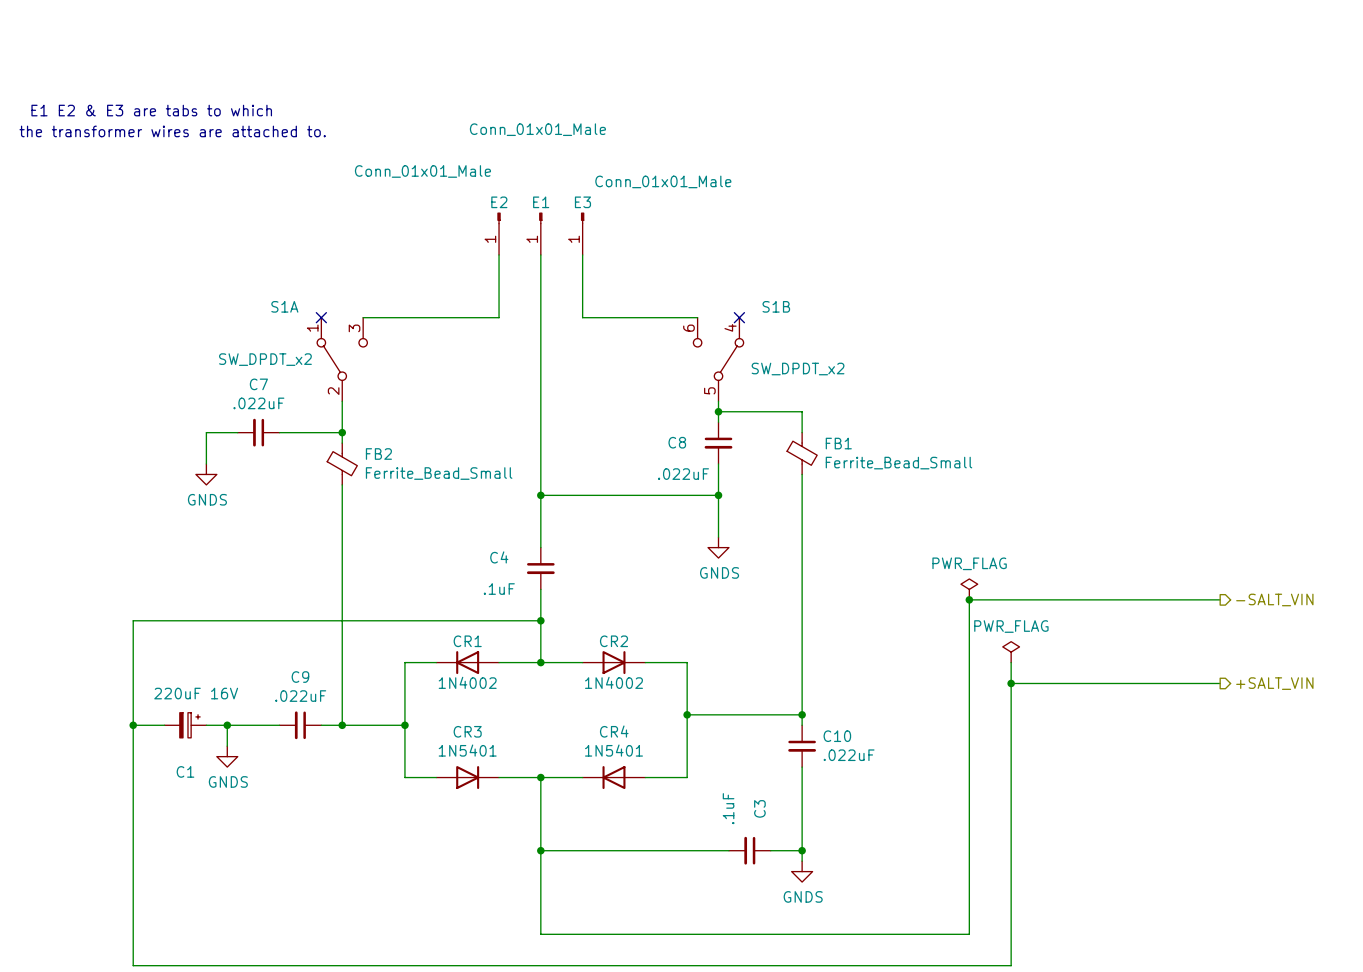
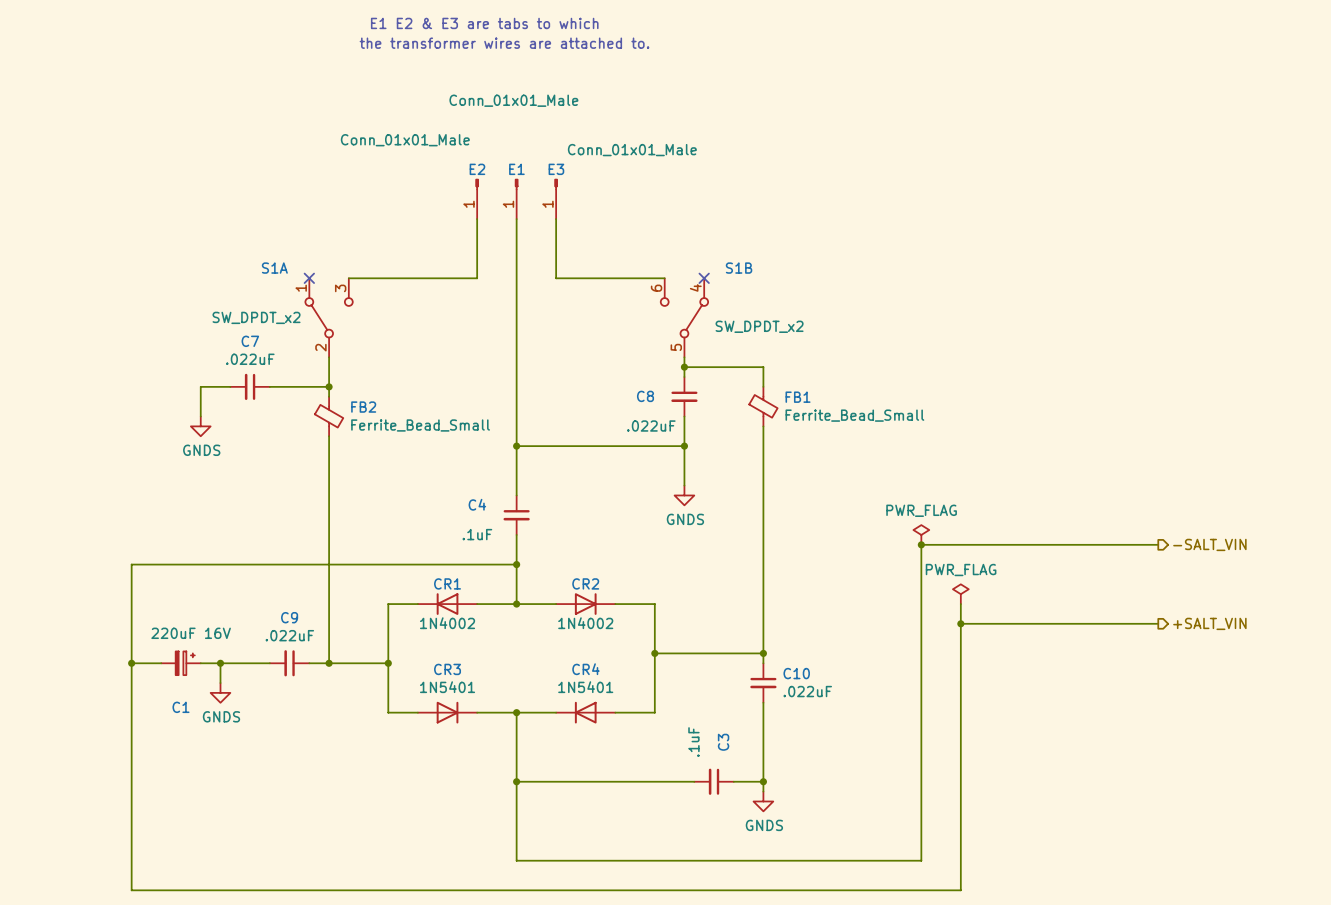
text: none -> E1 E2 & E3 are tabs to which (484, 23)
text: none -> the transformer wires are attached to. (504, 43)
text: E1 E2 & E3 are tabs to which (151, 110) -> none
text: the transformer wires are attached to. (172, 131) -> none

